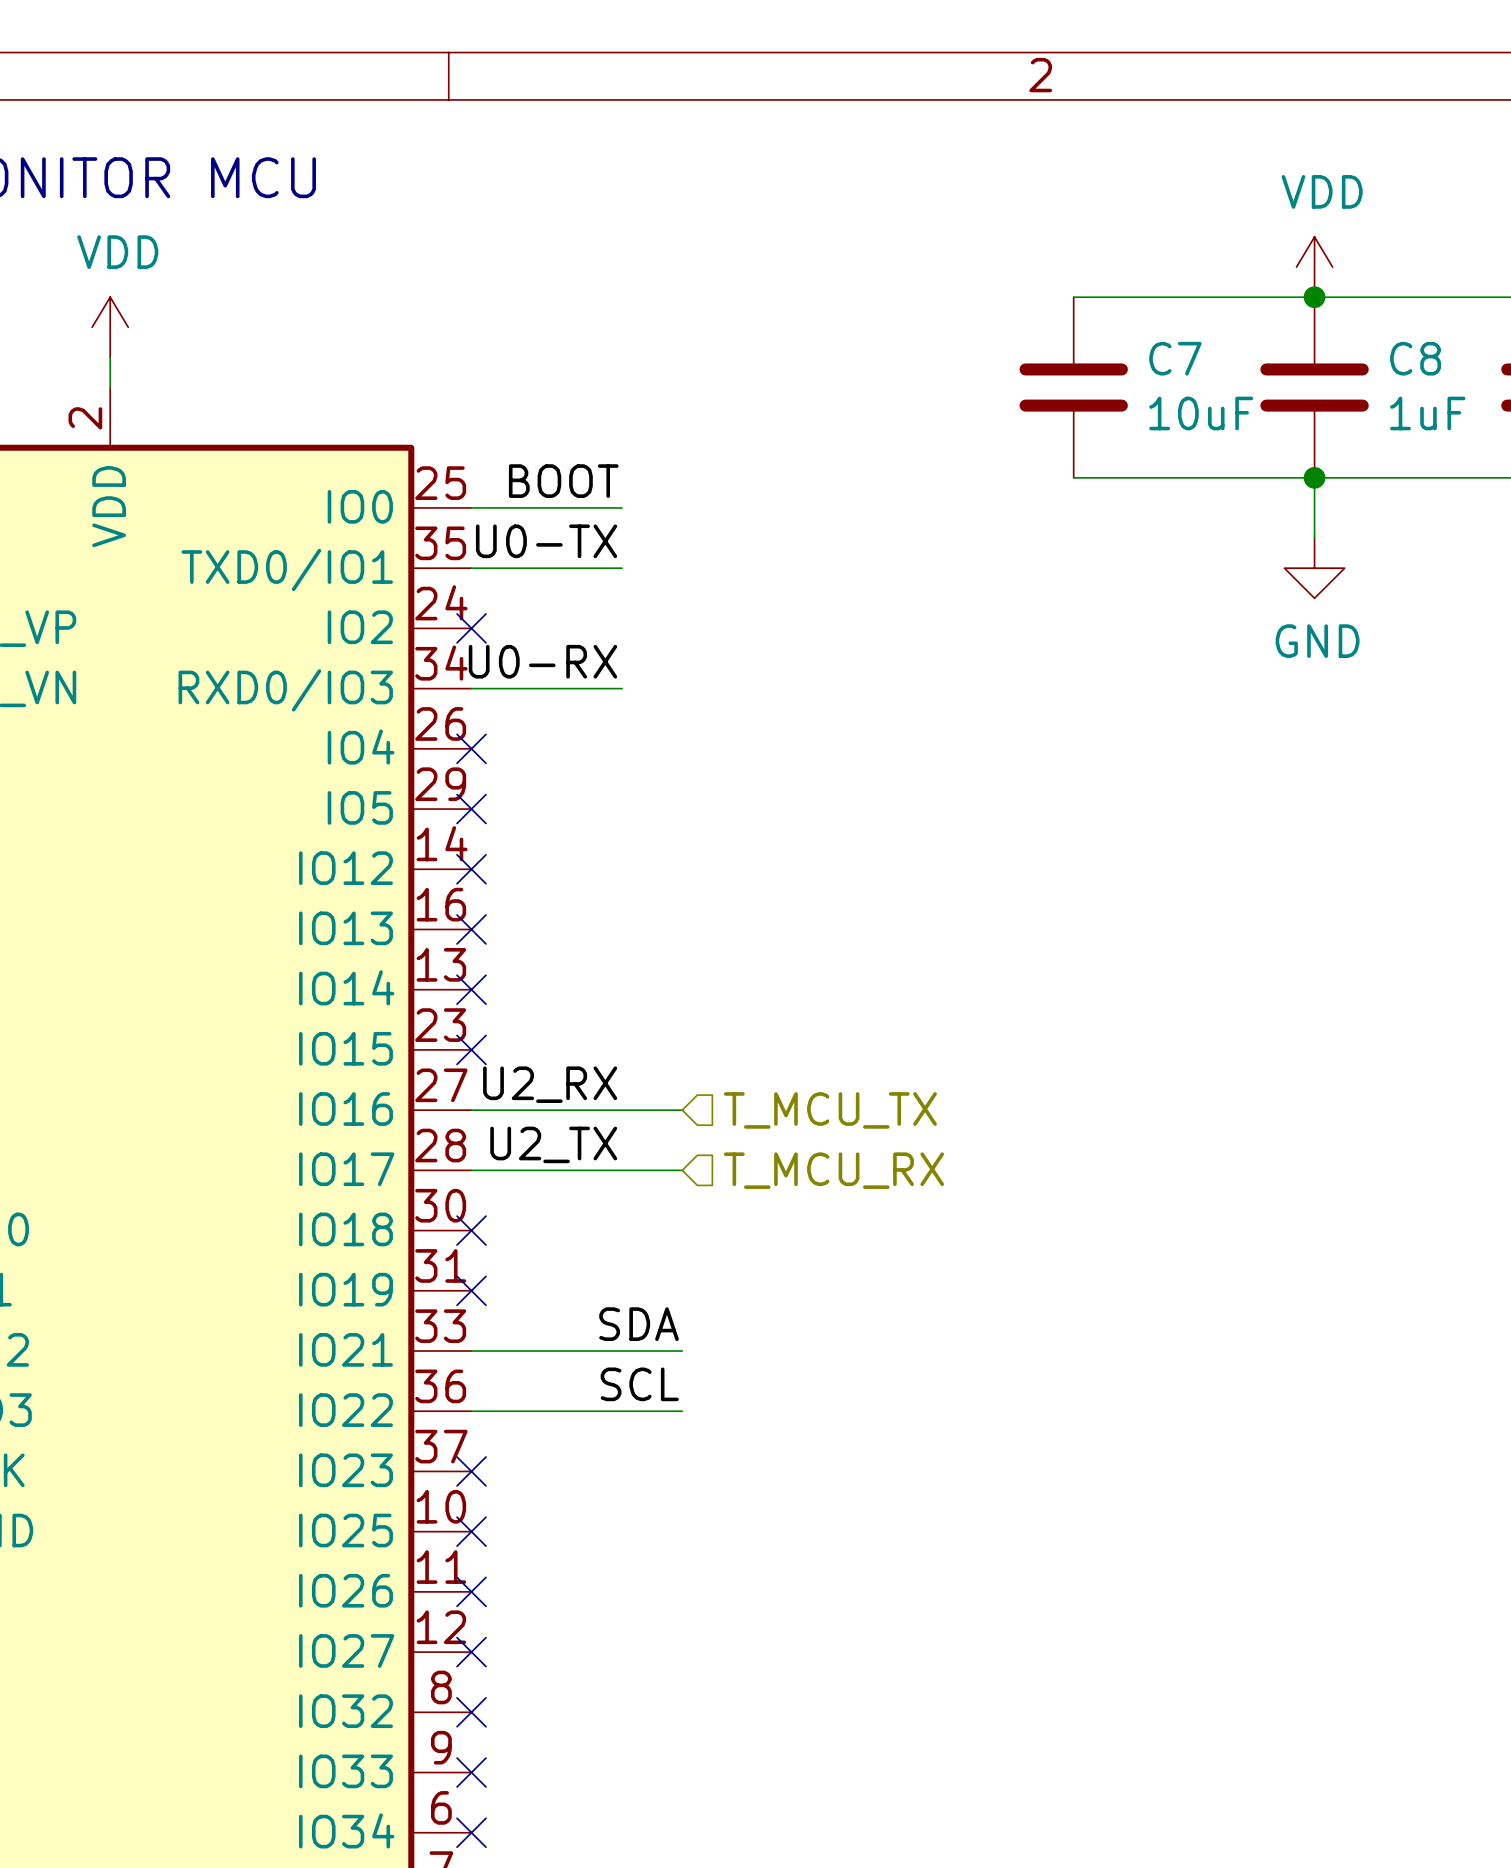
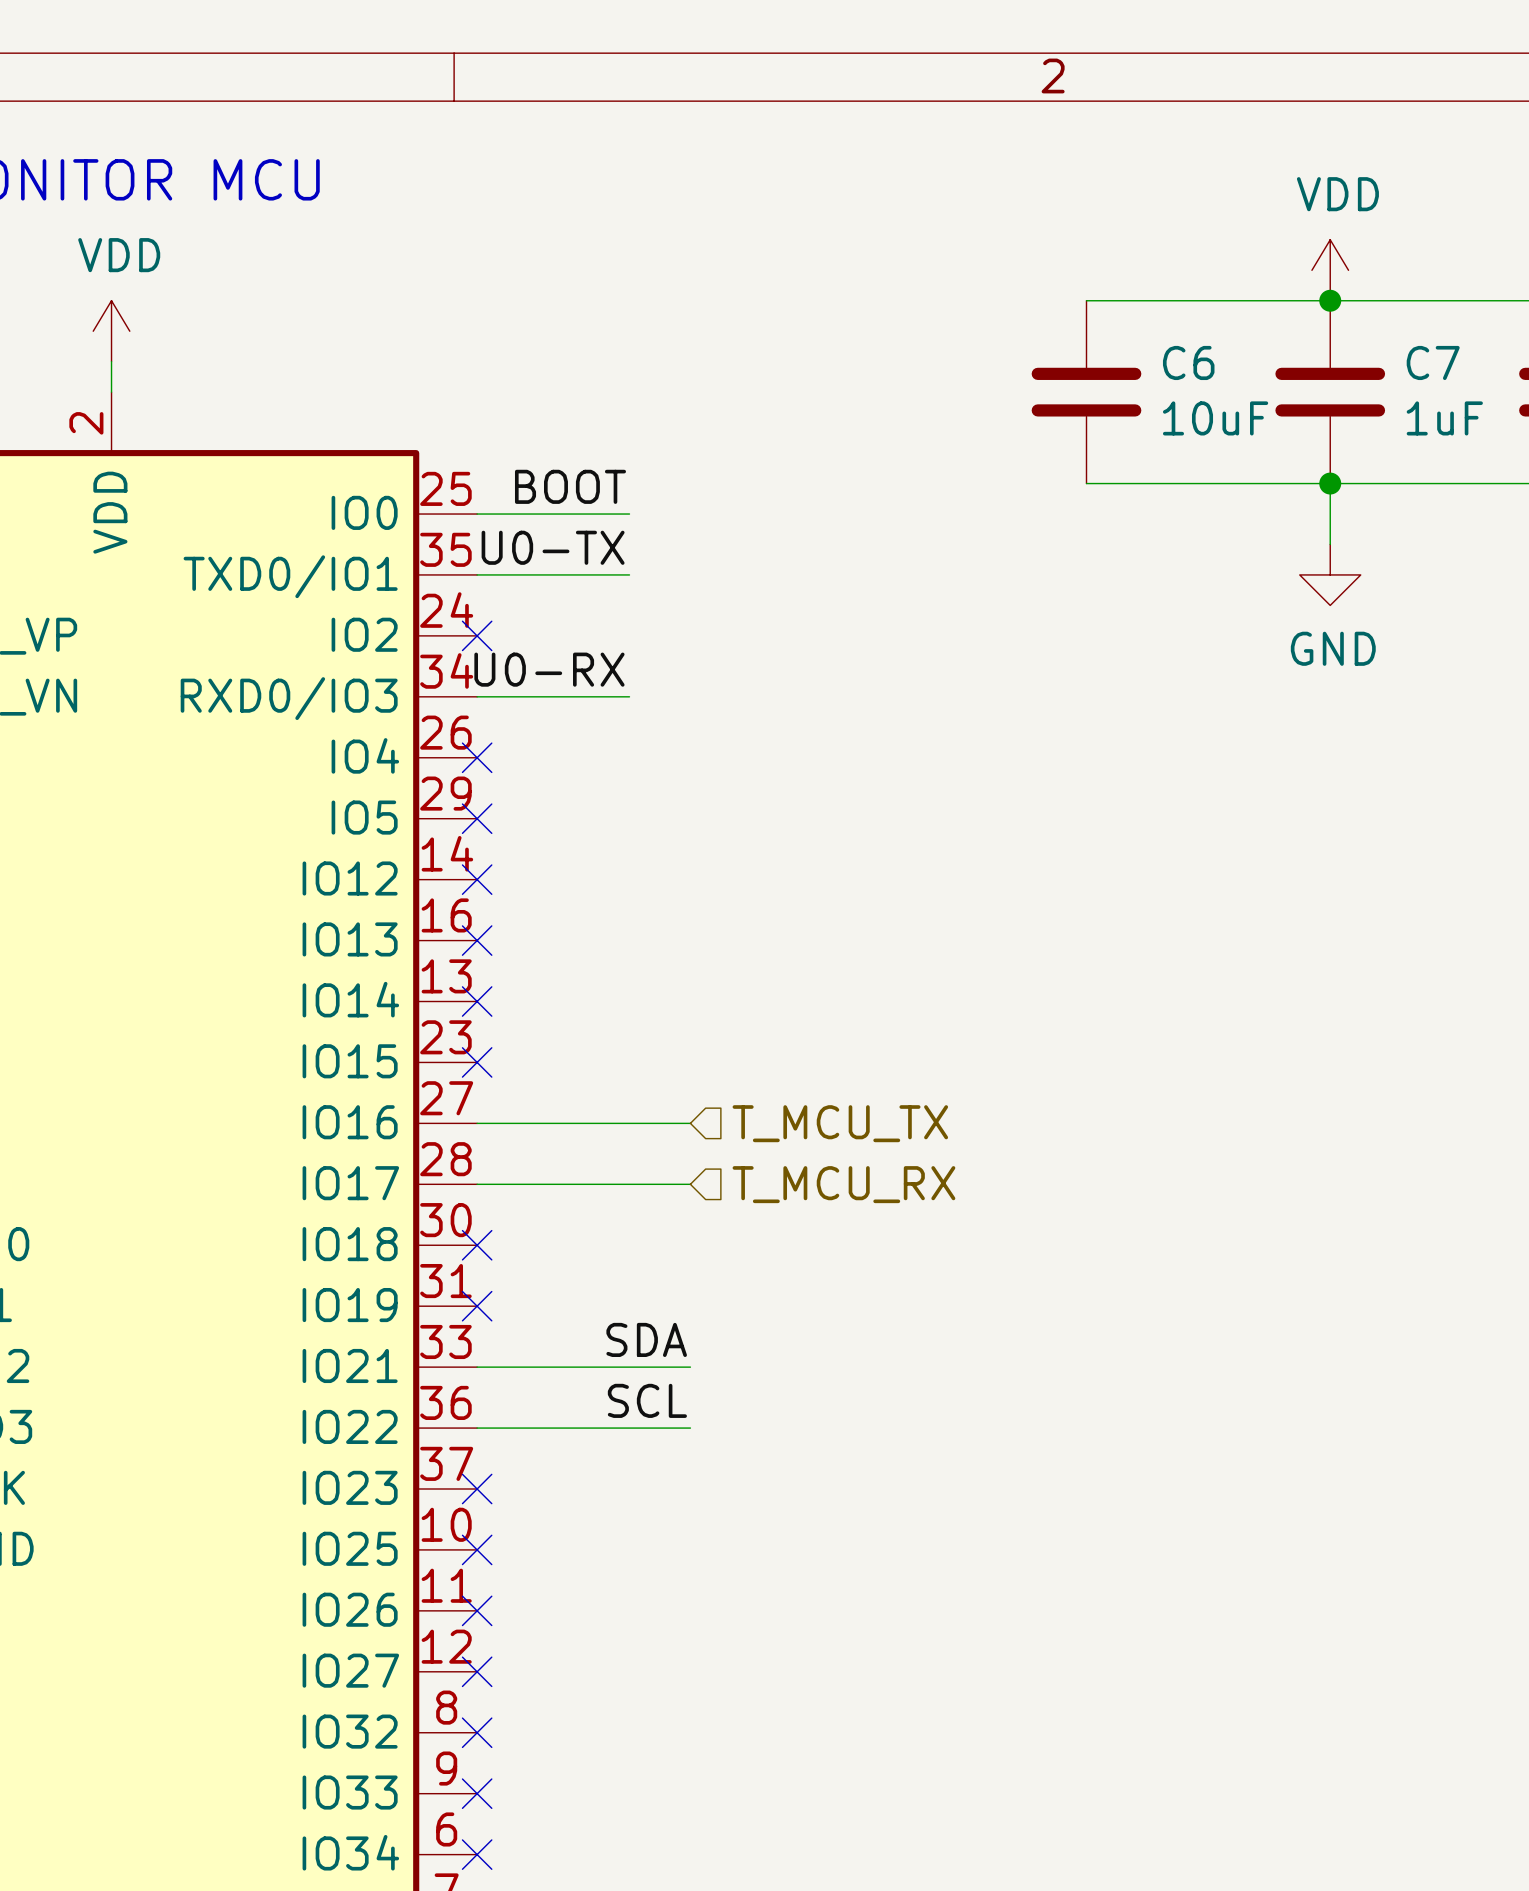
C7 name: C7 (1175, 358) -> C6 (1188, 362)
C8 name: C8 (1415, 358) -> C7 (1433, 362)
label: U2_RX (550, 1084) -> none
label: U2_TX (553, 1144) -> none

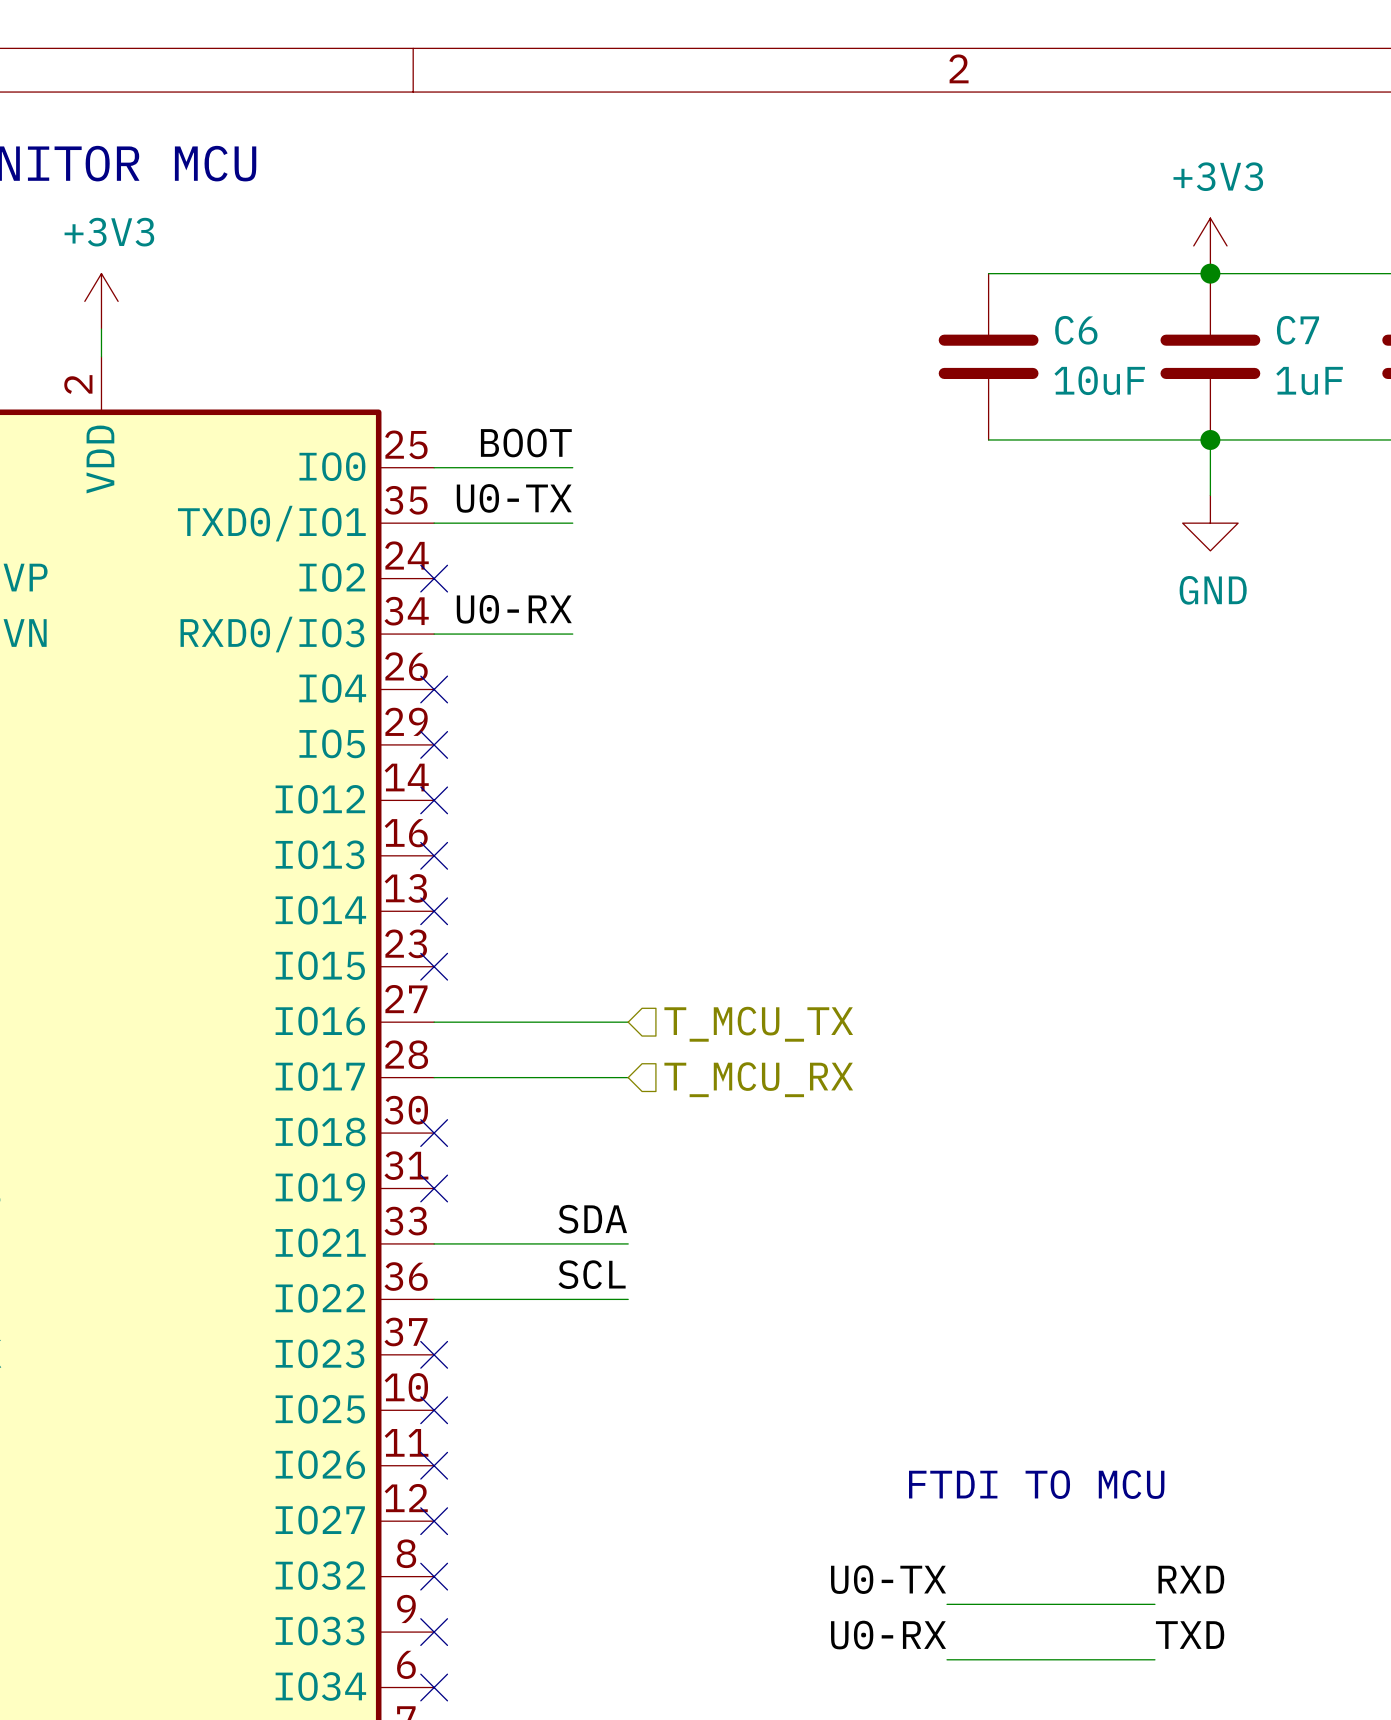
power symbol: VDD (1330, 270) -> +3V3 (1210, 245)
power symbol: VDD (111, 331) -> +3V3 (101, 301)
text: none -> FTDI TO MCU (1036, 1484)
label: none -> U0-TX (888, 1579)
label: none -> RXD (1191, 1579)
wire: none -> (947, 1604) (1154, 1604)
label: none -> U0-RX (888, 1635)
label: none -> TXD (1190, 1635)
wire: none -> (947, 1659) (1154, 1659)

